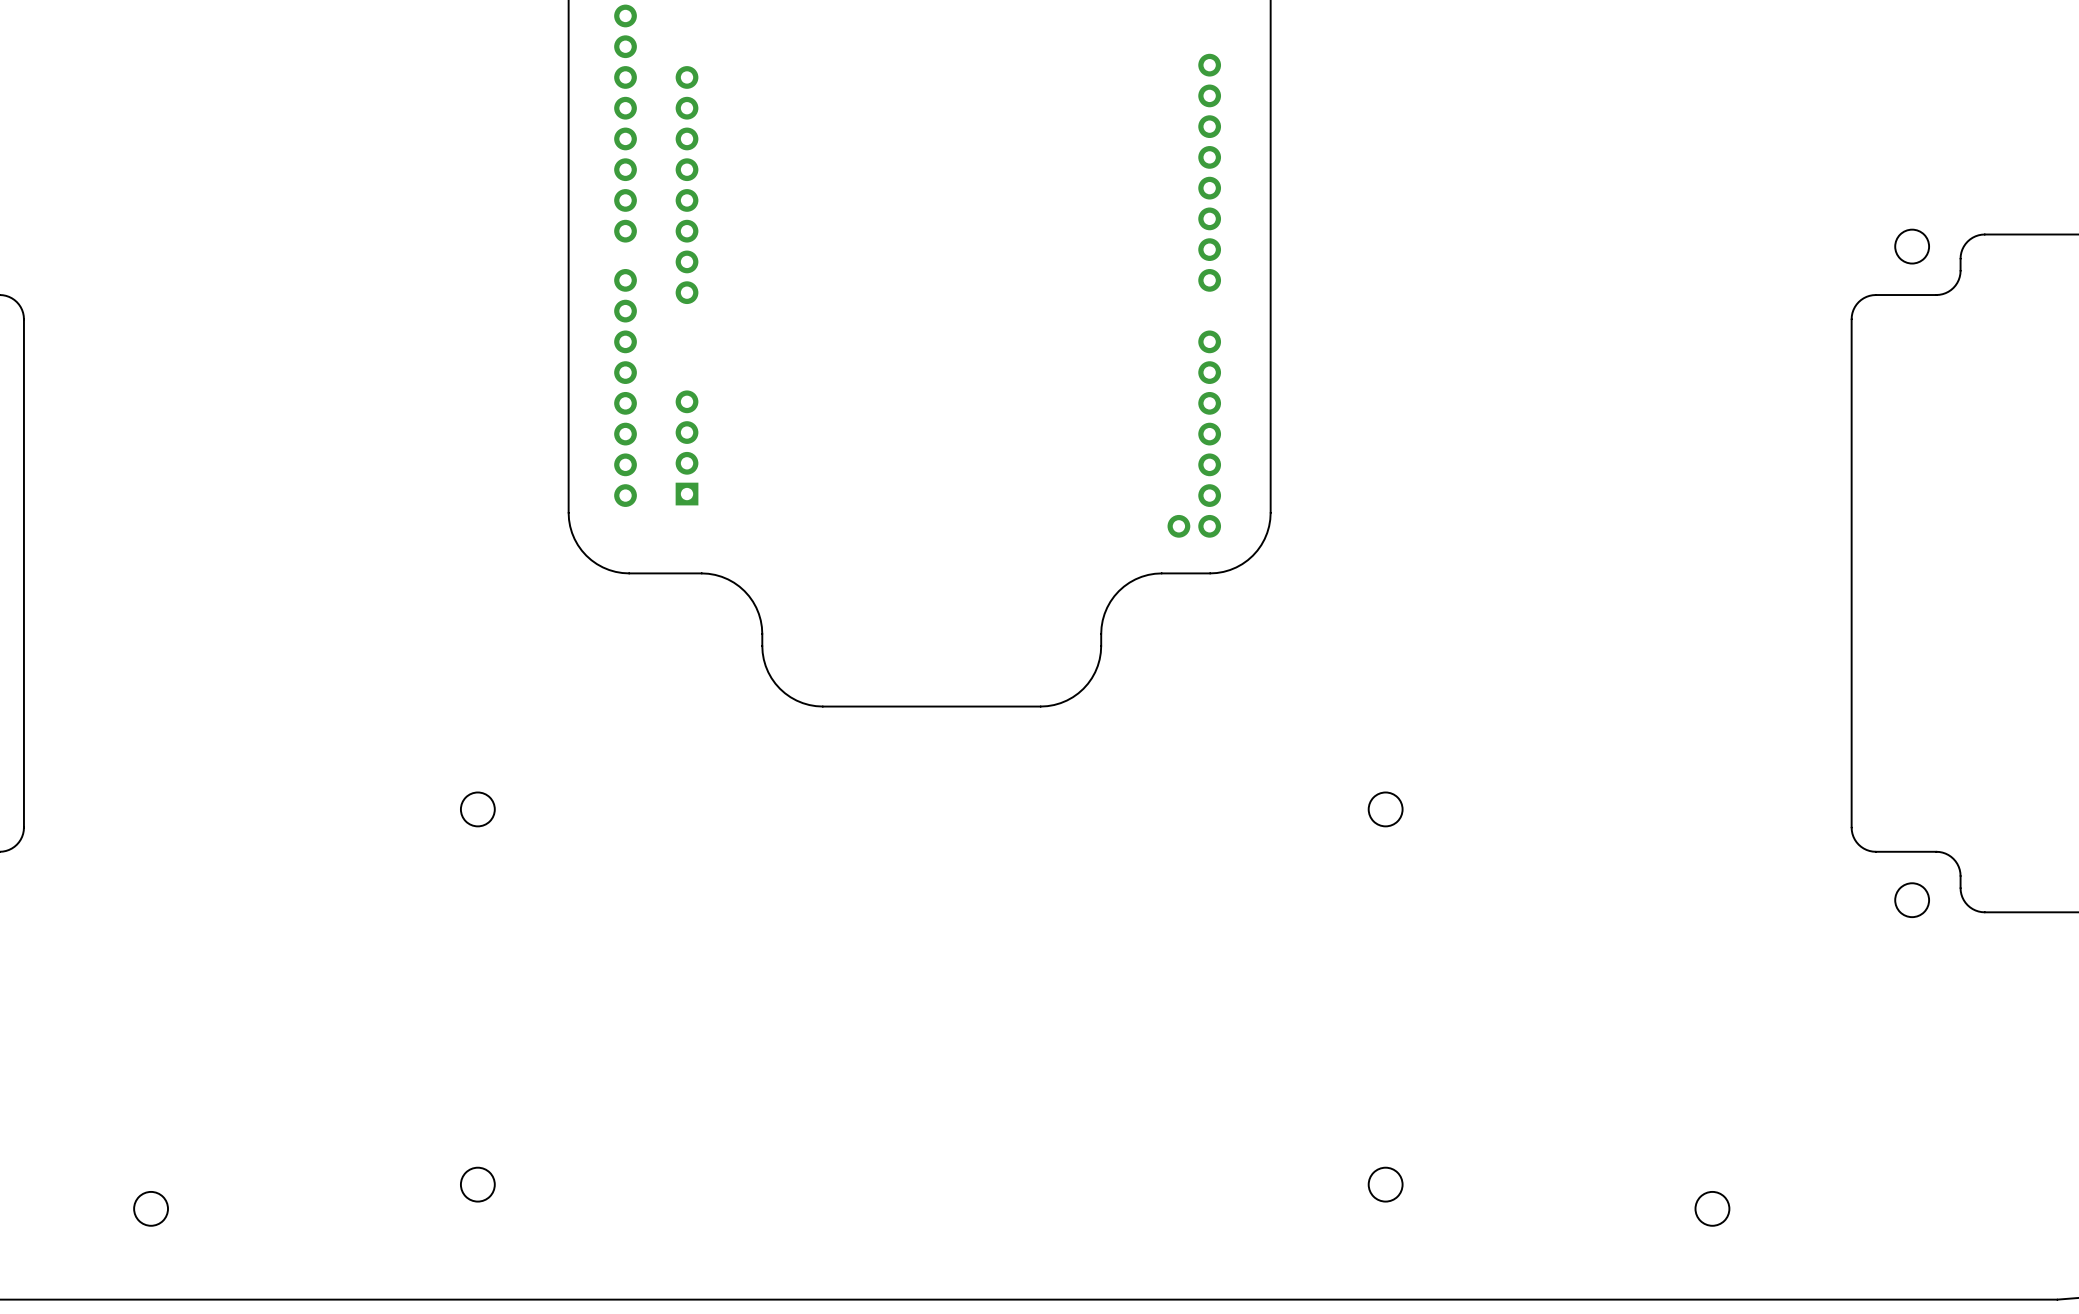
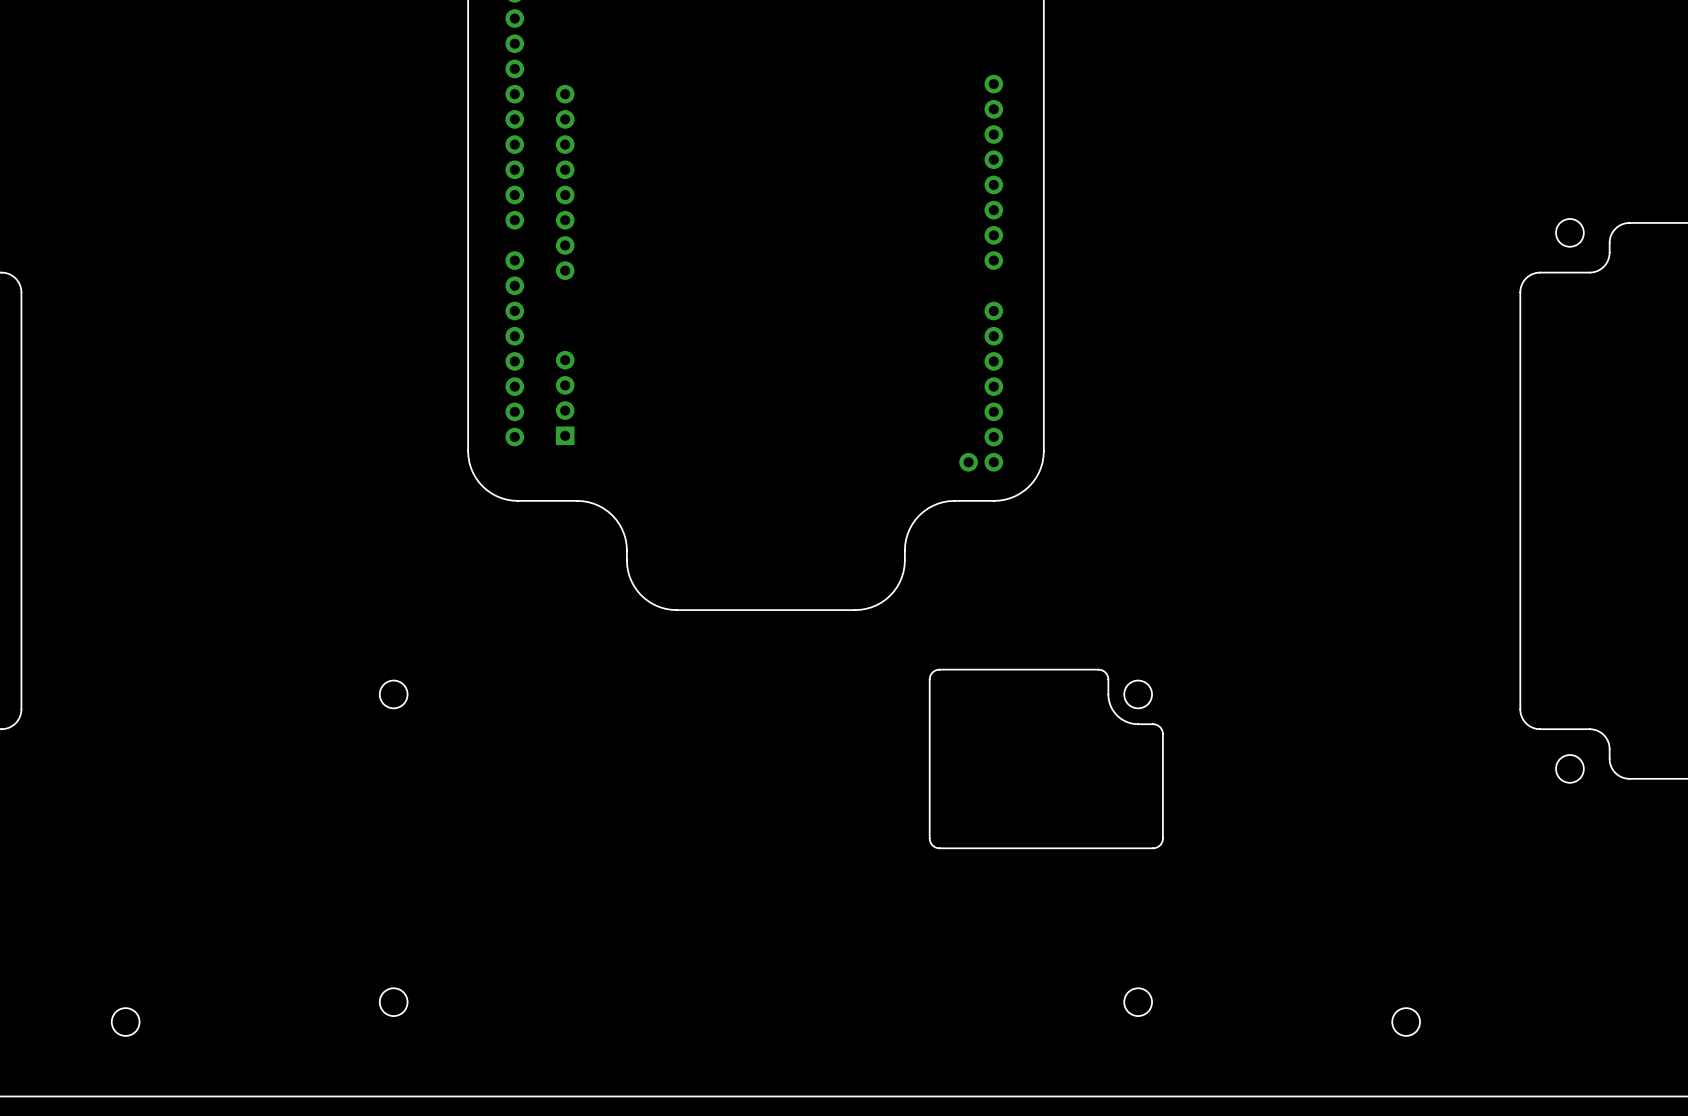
board edge: none -> (1098, 669) (939, 669) (932, 672) (929, 679) (929, 838) (932, 845) (939, 848) (1153, 848) (1160, 845) (1162, 838) (1162, 730) (1155, 724) (1130, 723) (1117, 715) (1109, 702) (1107, 675) (1104, 671) (1098, 669)

